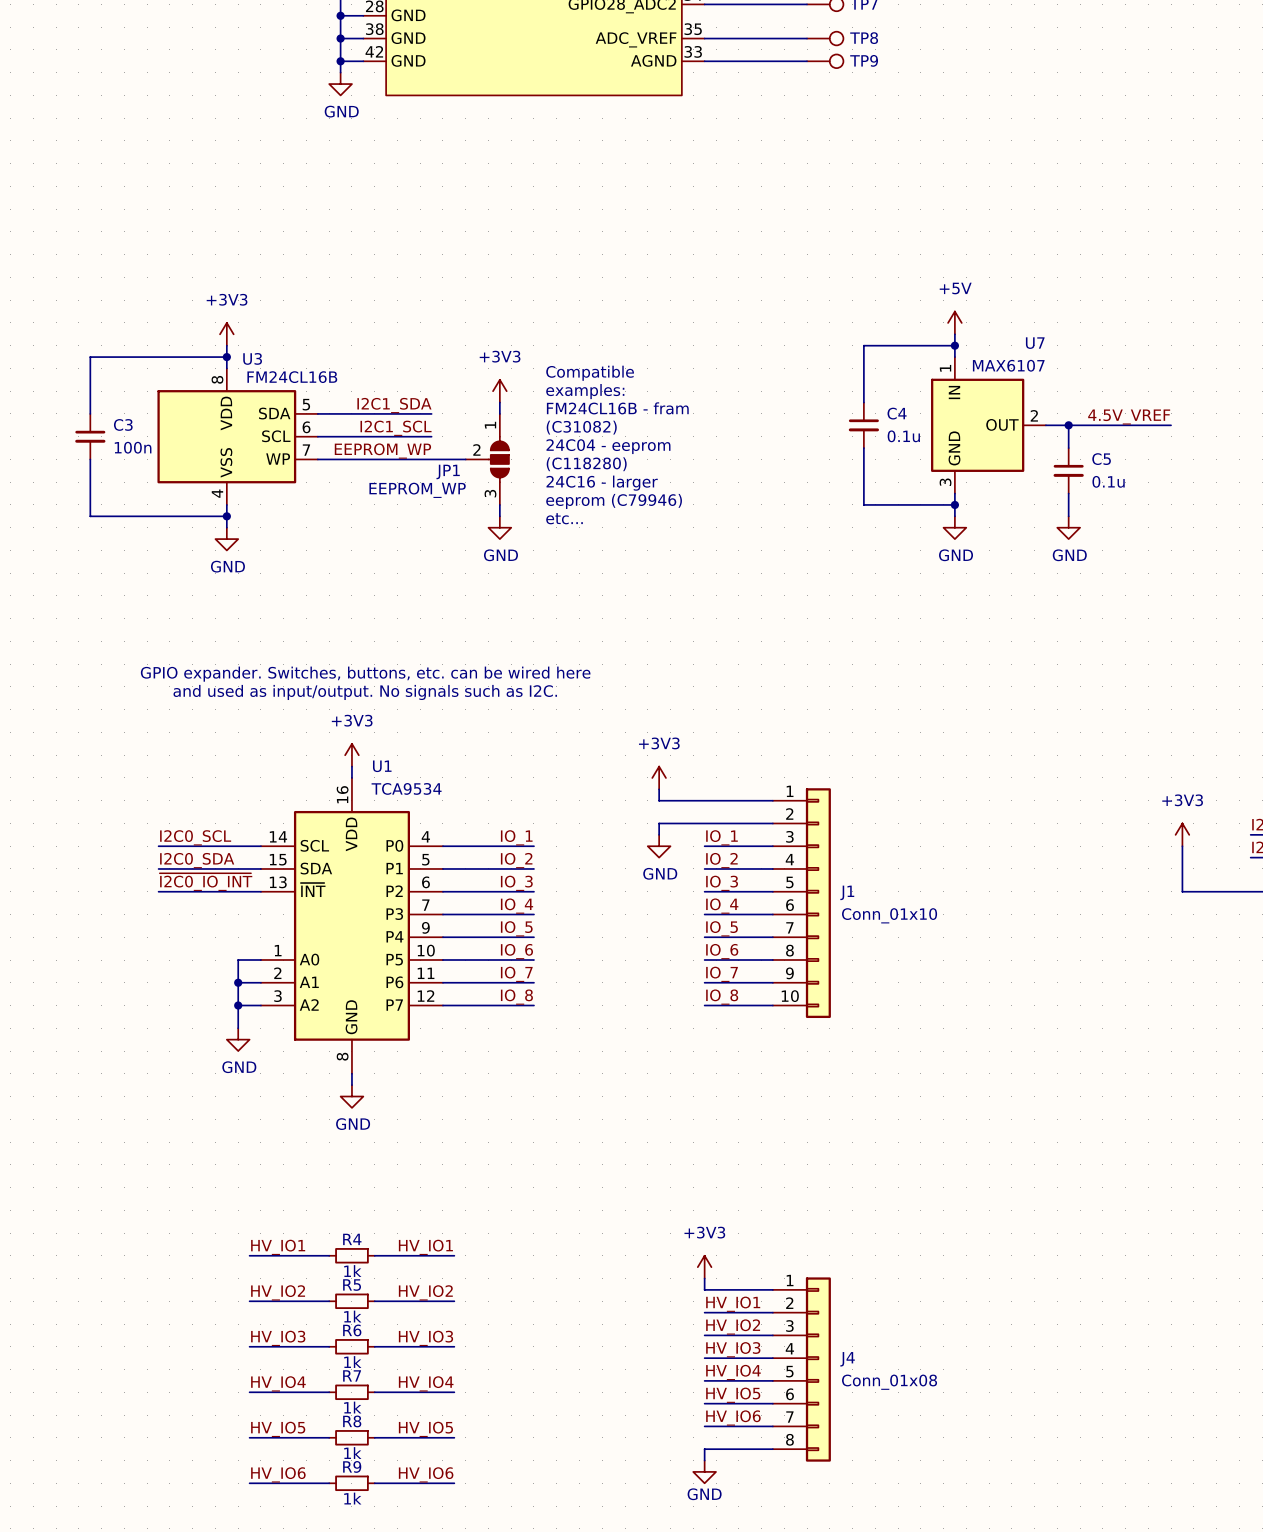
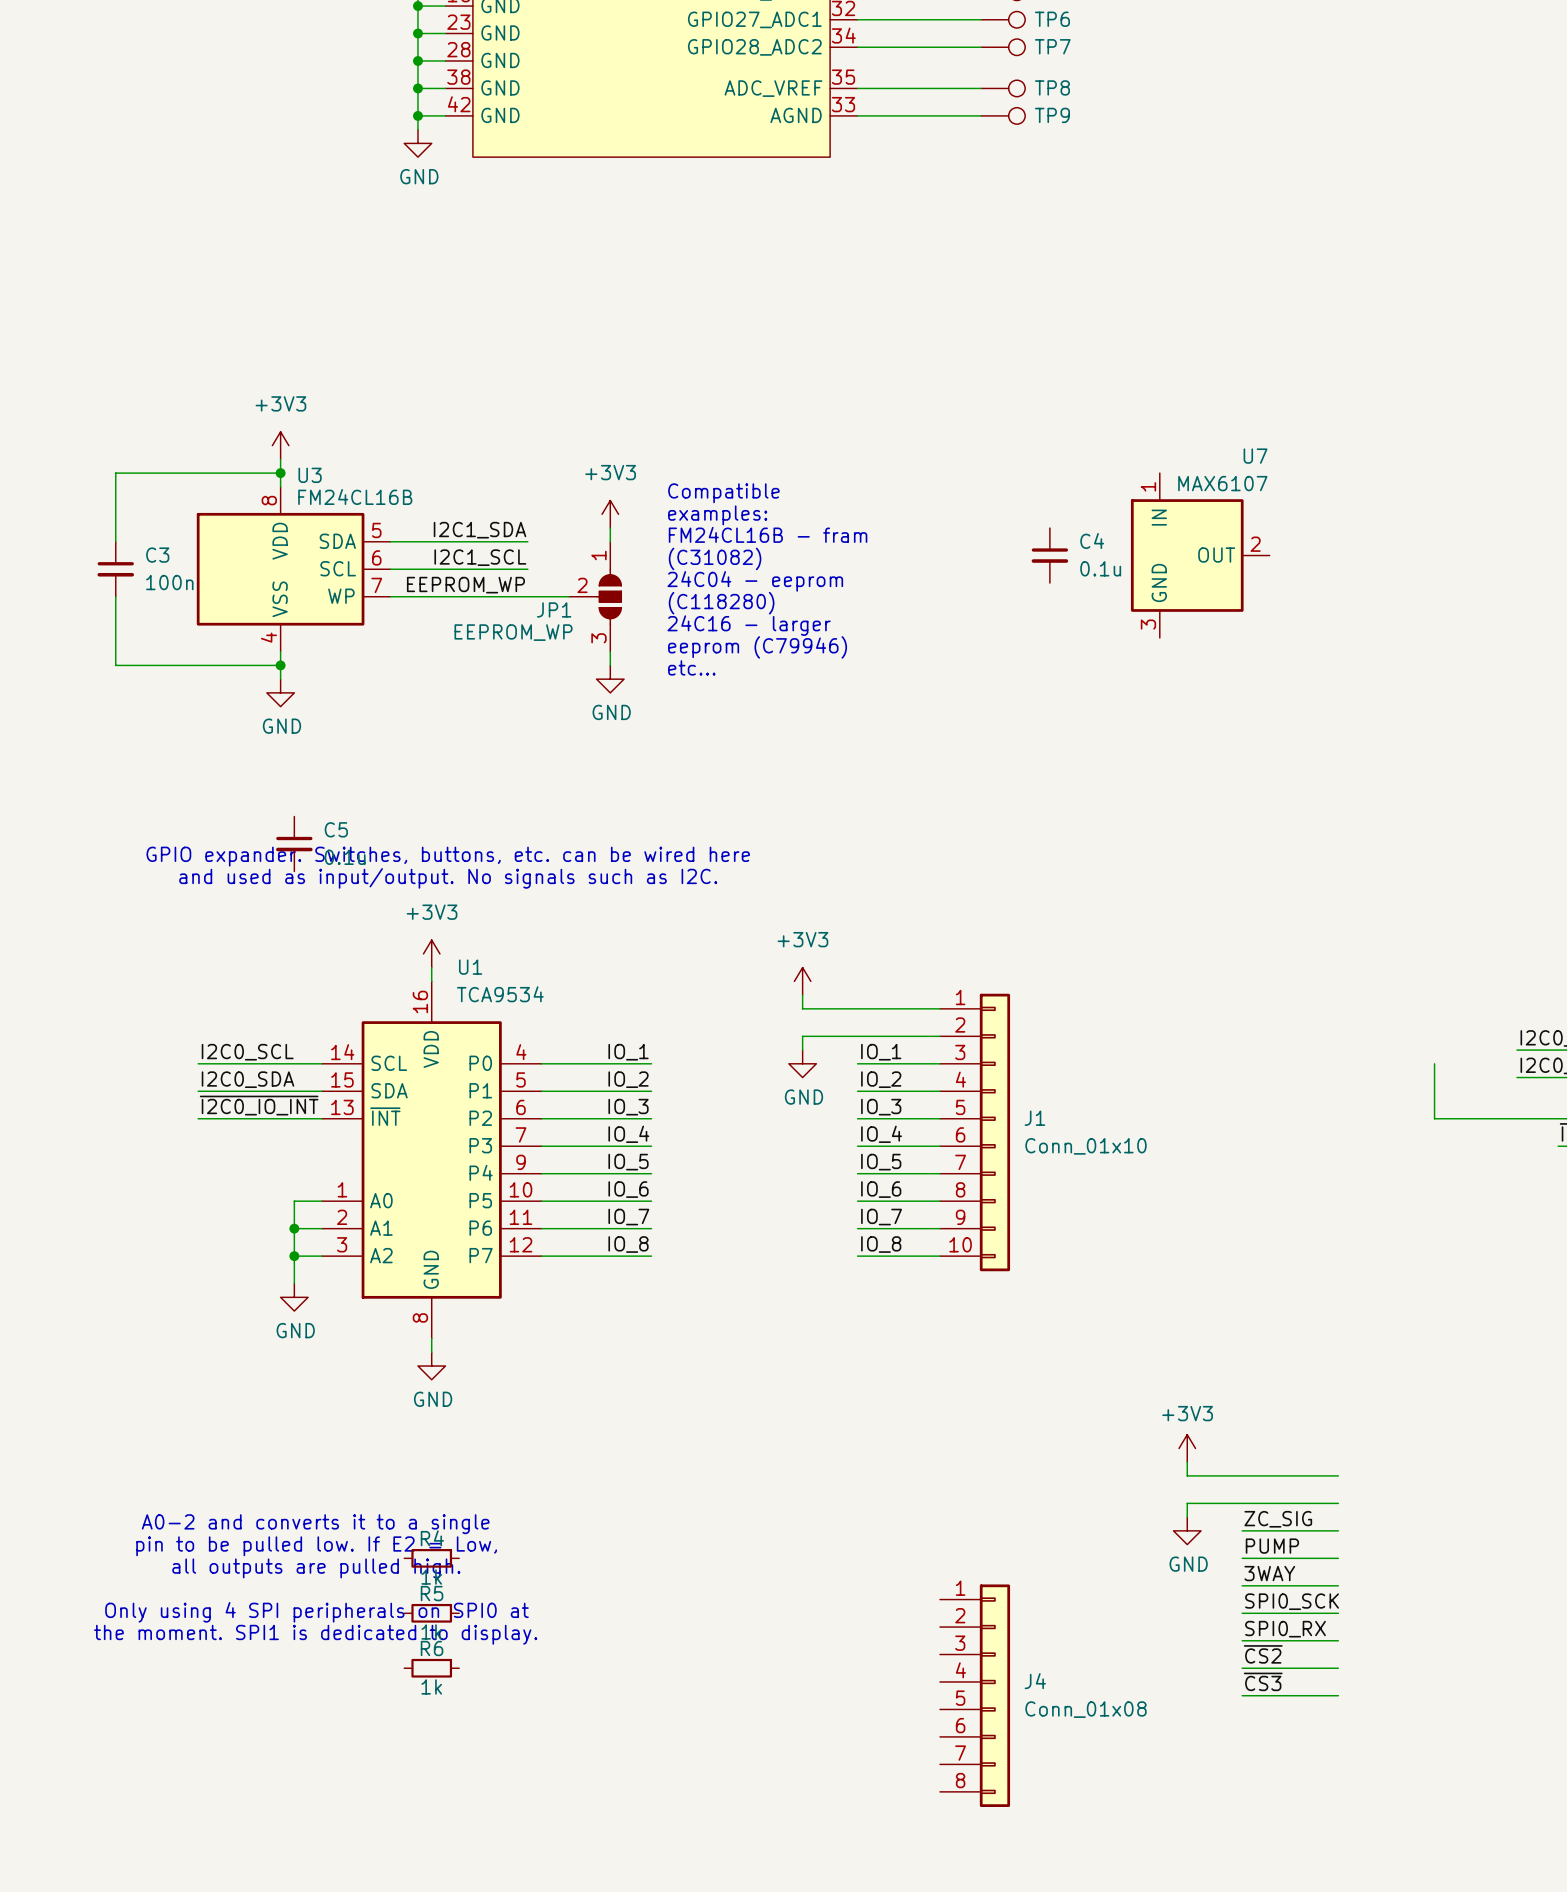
power symbol: +5V (954, 322) -> none
wire: (954, 334) (954, 357) -> none
wire: (954, 345) (863, 345) (863, 402) -> none
junction: (954, 345) -> none
label: 4.5V_VREF (1129, 417) -> none
wire: (1045, 425) (1171, 425) -> none
wire: (1068, 425) (1068, 448) -> none
junction: (1068, 425) -> none
wire: (863, 448) (863, 504) (954, 504) -> none
C5 position: (1068, 470) -> (294, 844)
wire: (954, 493) (954, 516) -> none
wire: (1068, 493) (1068, 516) -> none
junction: (954, 504) -> none
power symbol: GND (954, 527) -> none
power symbol: GND (1068, 527) -> none
power symbol: +3V3 (1182, 834) -> none
power symbol: none -> +3V3 (1187, 1448)
wire: none -> (1187, 1462) (1187, 1475) (1338, 1475)
wire: none -> (1338, 1503) (1187, 1503) (1187, 1517)
label: none -> ZC_SIG (1278, 1519)
text: none -> A0-2 and converts it to a single (315, 1524)
power symbol: none -> GND (1187, 1530)
wire: none -> (1242, 1530) (1338, 1530)
text: none -> pin to be pulled low. If E2 = Low, (316, 1546)
label: none -> PUMP (1272, 1546)
label: HV_IO1 (278, 1247) -> none
label: HV_IO1 (425, 1247) -> none
wire: (249, 1255) (329, 1255) -> none
wire: (374, 1255) (454, 1255) -> none
wire: none -> (1242, 1558) (1338, 1558)
text: none -> all outputs are pulled high. (316, 1568)
power symbol: +3V3 (704, 1267) -> none
label: none -> 3WAY (1269, 1573)
wire: (704, 1278) (704, 1289) (772, 1289) -> none
wire: none -> (1242, 1585) (1338, 1585)
label: HV_IO2 (278, 1292) -> none
label: HV_IO2 (425, 1292) -> none
label: none -> SPI0_SCK (1292, 1601)
text: none -> Only using 4 SPI peripherals on SPI0 at (316, 1612)
wire: (249, 1301) (329, 1301) -> none
wire: (374, 1301) (454, 1301) -> none
wire: none -> (1242, 1613) (1338, 1613)
label: HV_IO1 (733, 1304) -> none
wire: (704, 1312) (772, 1312) -> none
label: none -> SPI0_RX (1285, 1629)
text: none -> the moment. SPI1 is dedicated to display. (315, 1634)
wire: none -> (1242, 1640) (1338, 1640)
label: HV_IO2 (733, 1326) -> none
wire: (704, 1335) (772, 1335) -> none
label: none -> ~{CS2} (1263, 1654)
label: HV_IO3 (278, 1338) -> none
label: HV_IO3 (425, 1338) -> none
wire: (249, 1346) (329, 1346) -> none
wire: (374, 1346) (454, 1346) -> none
wire: none -> (1242, 1668) (1338, 1668)
label: HV_IO3 (733, 1349) -> none
wire: (704, 1358) (772, 1358) -> none
label: none -> ~{CS3} (1263, 1681)
wire: none -> (1242, 1695) (1338, 1695)
label: HV_IO4 (733, 1372) -> none
wire: (704, 1380) (772, 1380) -> none
label: HV_IO4 (278, 1383) -> none
label: HV_IO4 (426, 1383) -> none
wire: (249, 1392) (329, 1392) -> none
R7: 1k (351, 1392) -> none
wire: (374, 1392) (454, 1392) -> none
label: HV_IO5 (733, 1395) -> none
wire: (704, 1403) (772, 1403) -> none
label: HV_IO6 (733, 1418) -> none
wire: (704, 1426) (772, 1426) -> none
label: HV_IO5 (278, 1429) -> none
label: HV_IO5 (425, 1429) -> none
wire: (249, 1437) (329, 1437) -> none
R8: 1k (351, 1437) -> none
wire: (374, 1437) (454, 1437) -> none
wire: (772, 1449) (704, 1449) (704, 1460) -> none
power symbol: GND (704, 1471) -> none
label: HV_IO6 (278, 1474) -> none
label: HV_IO6 (426, 1474) -> none
wire: (249, 1483) (329, 1483) -> none
R9: 1k (351, 1483) -> none
wire: (374, 1483) (454, 1483) -> none

